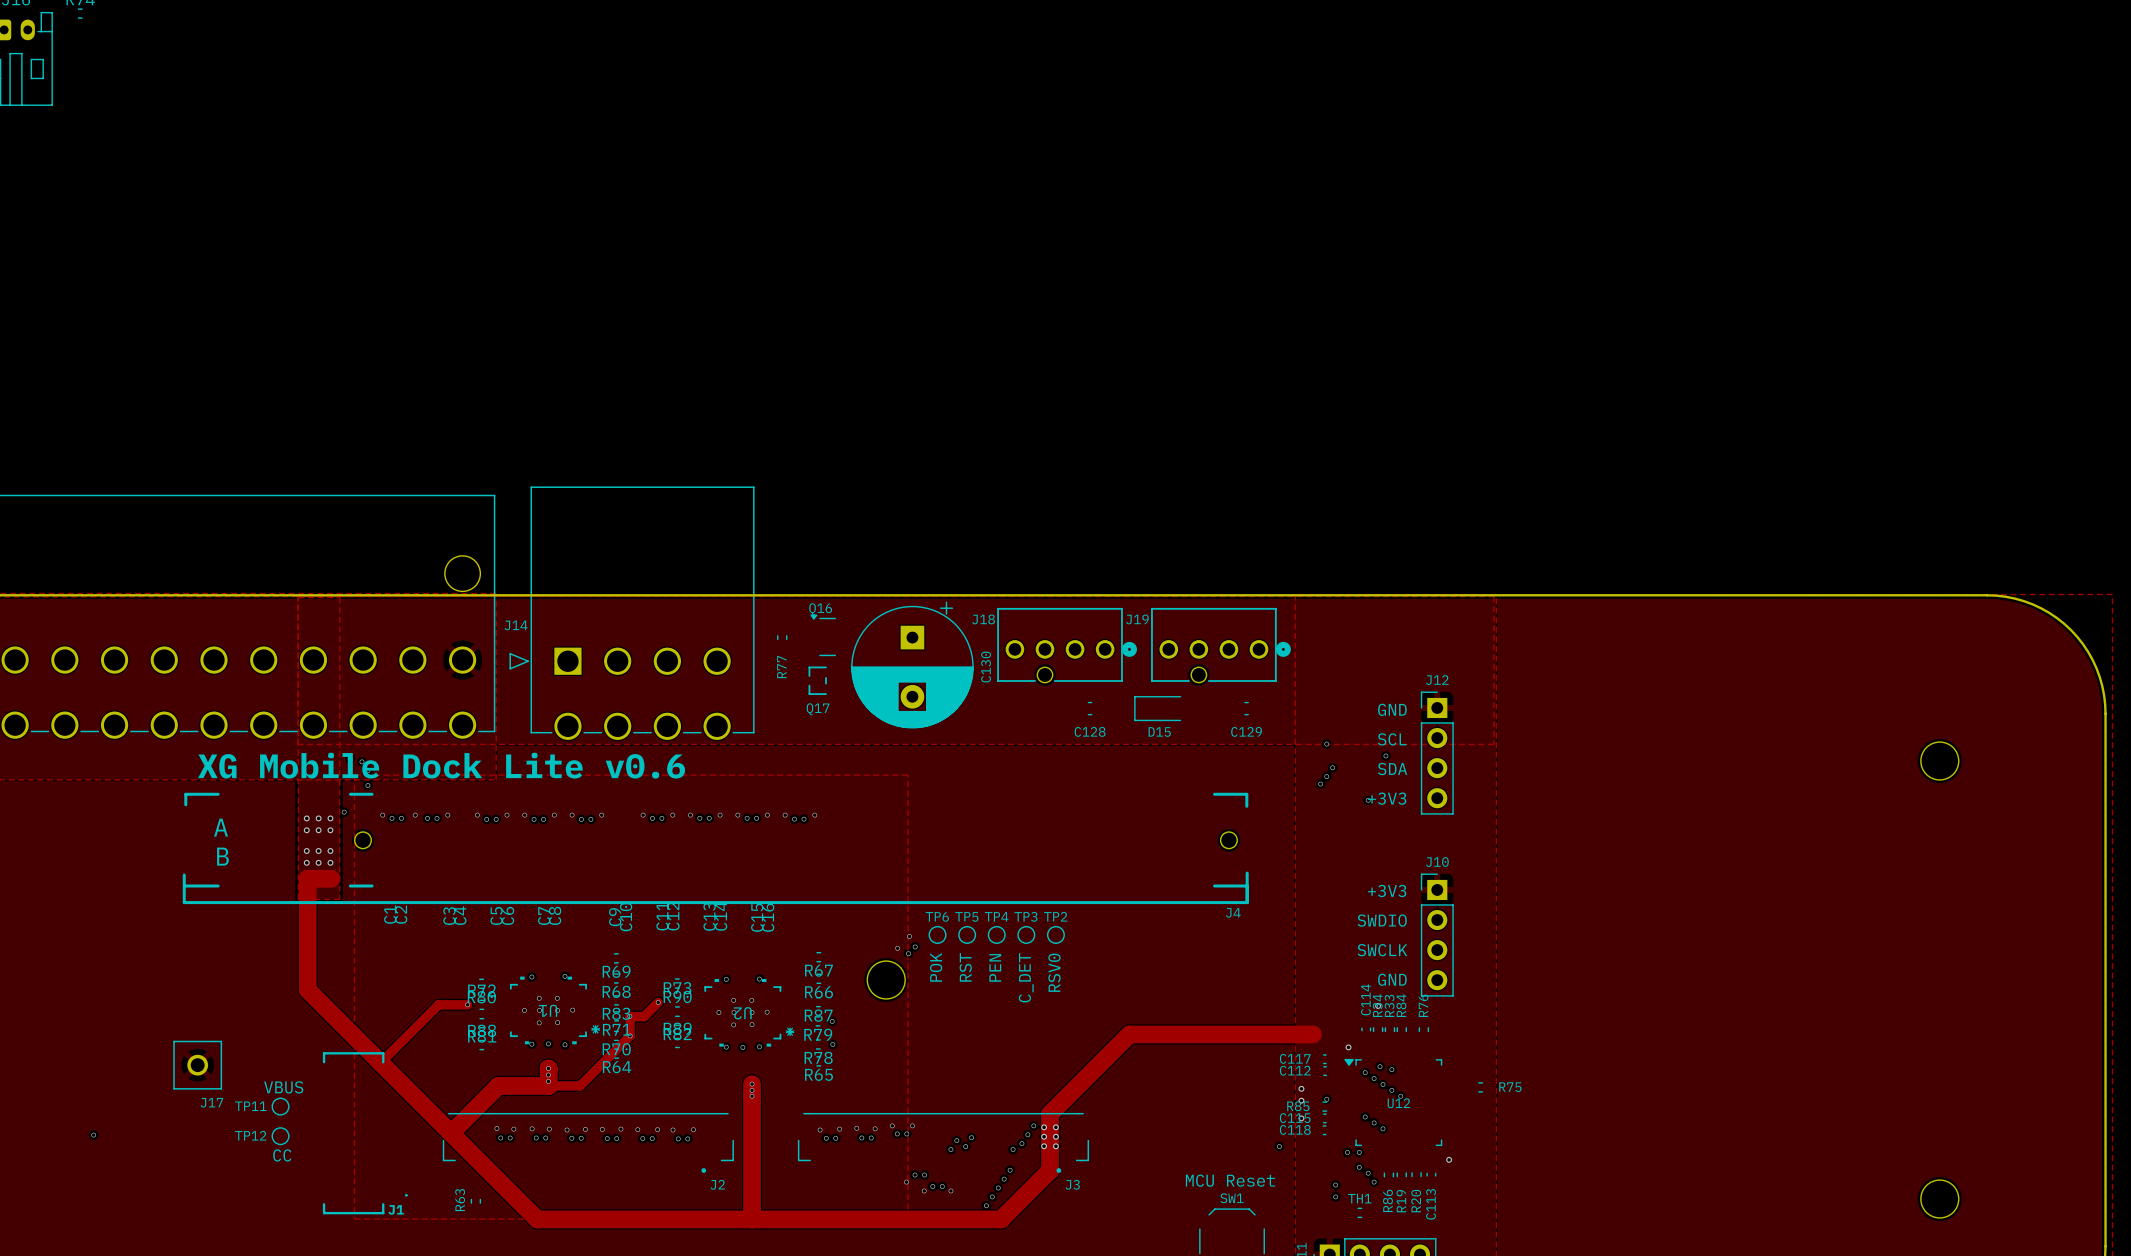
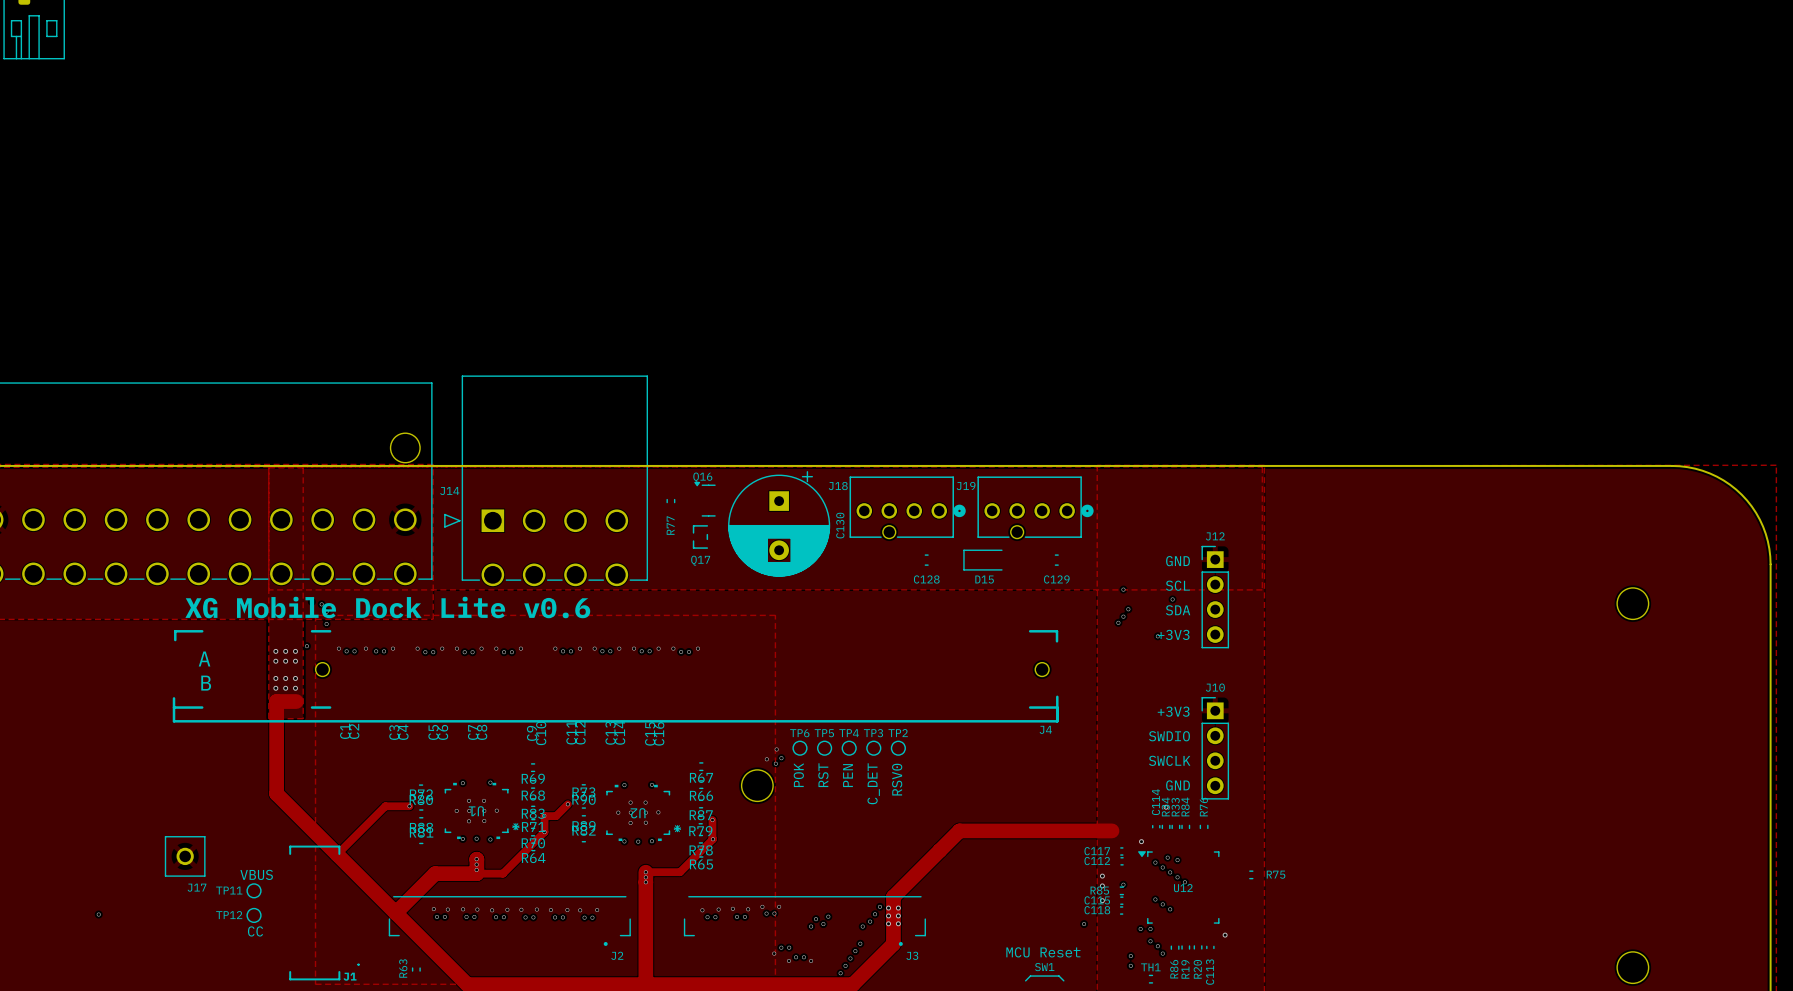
track: none -> (712, 820) (712, 839) (680, 872) (645, 872)

